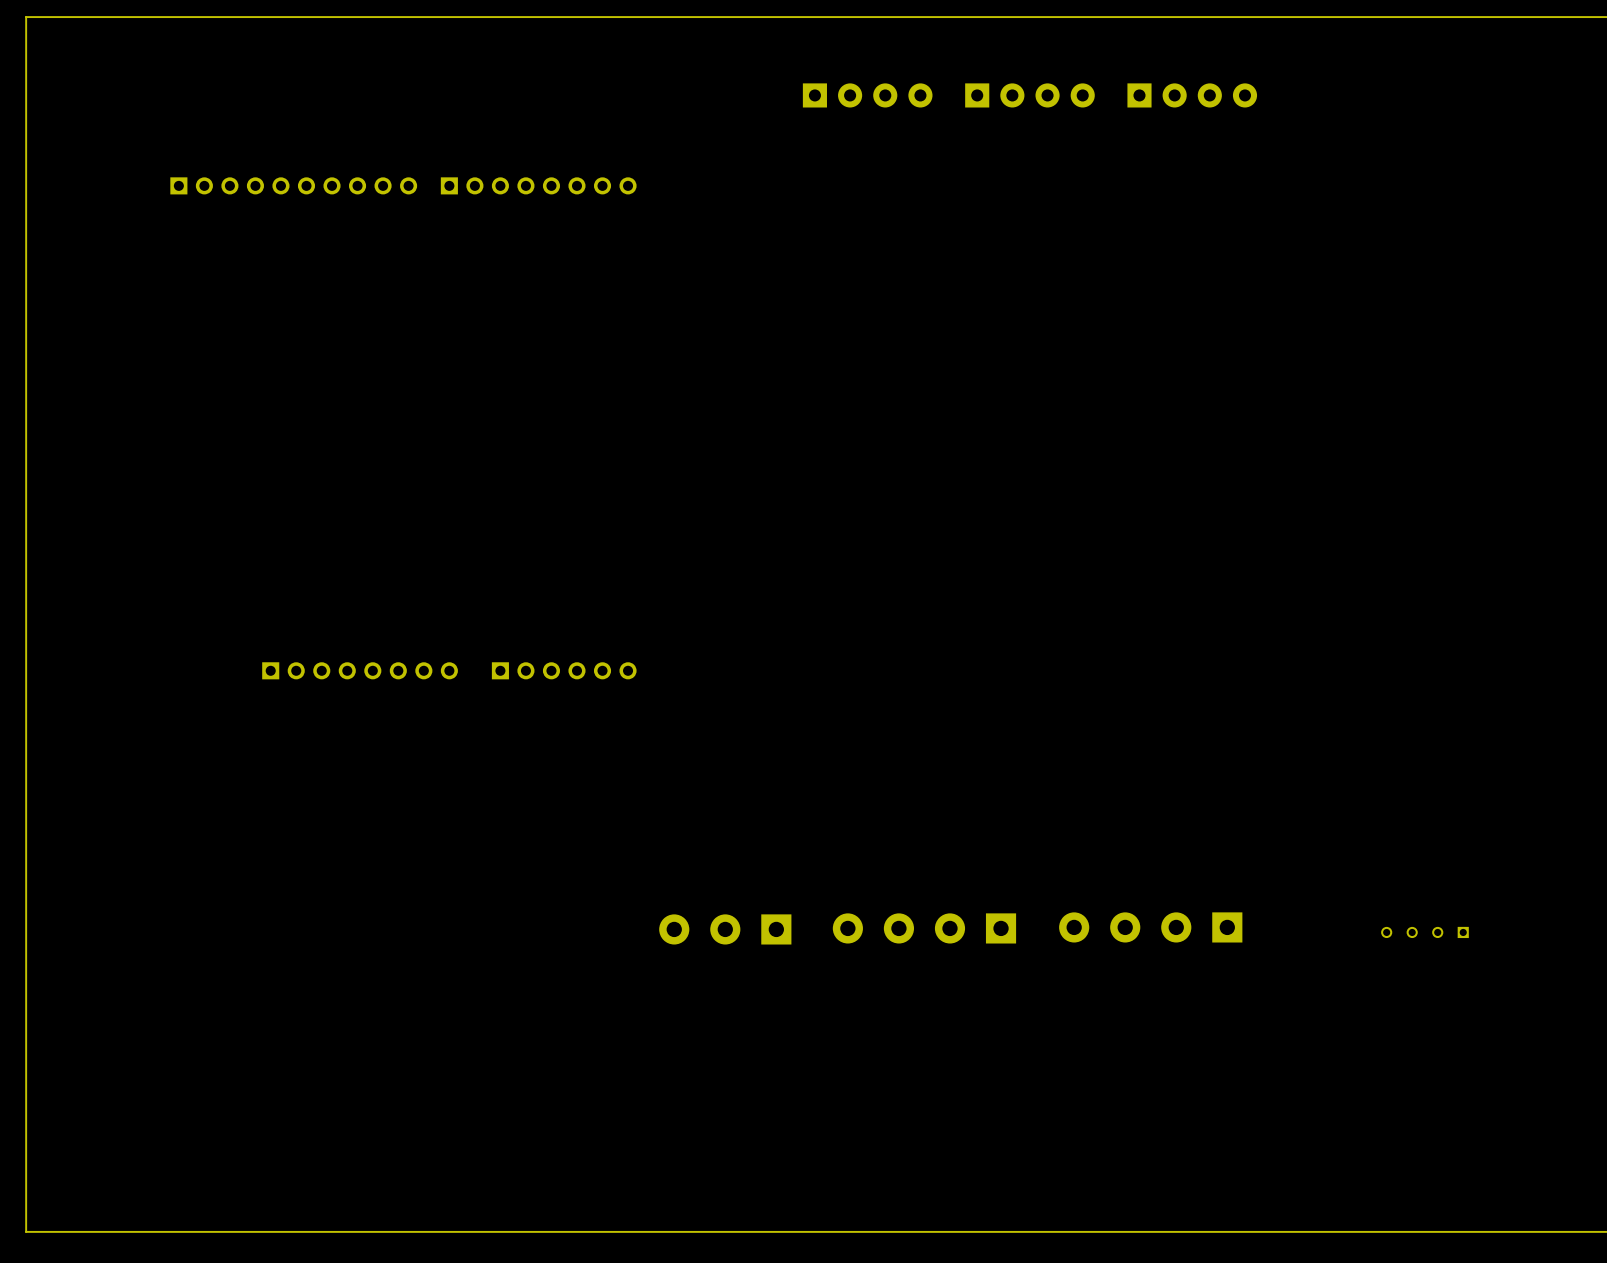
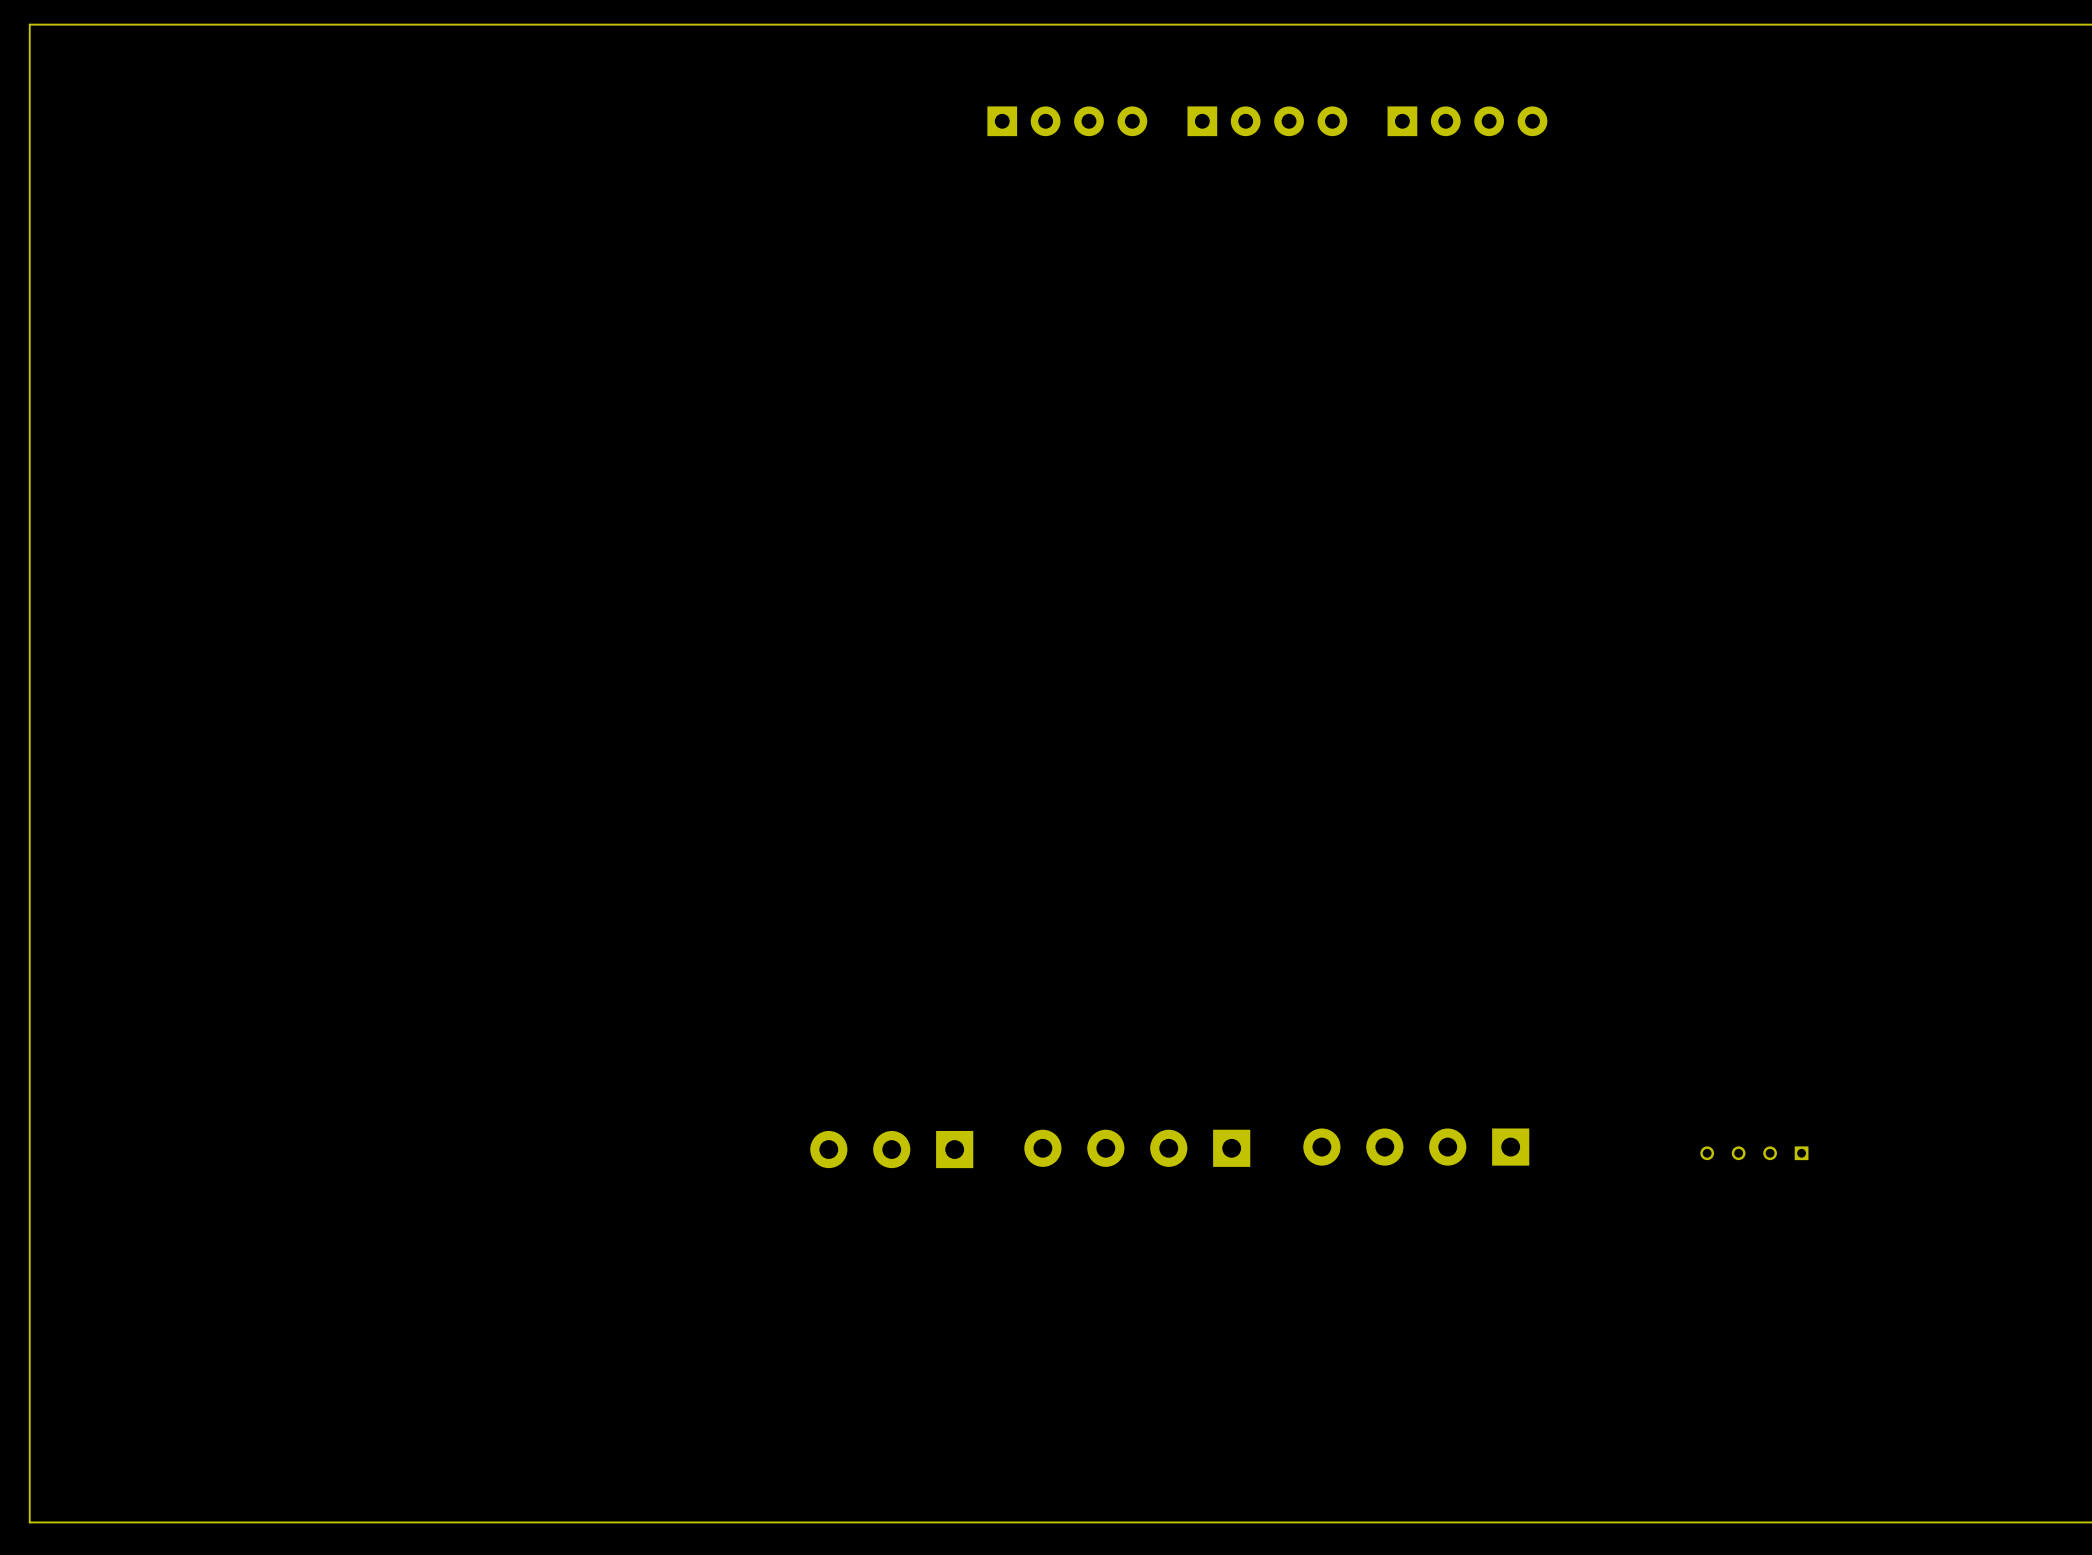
part: (293, 185) -> none
part: (538, 185) -> none
part: (360, 670) -> none
part: (564, 670) -> none

